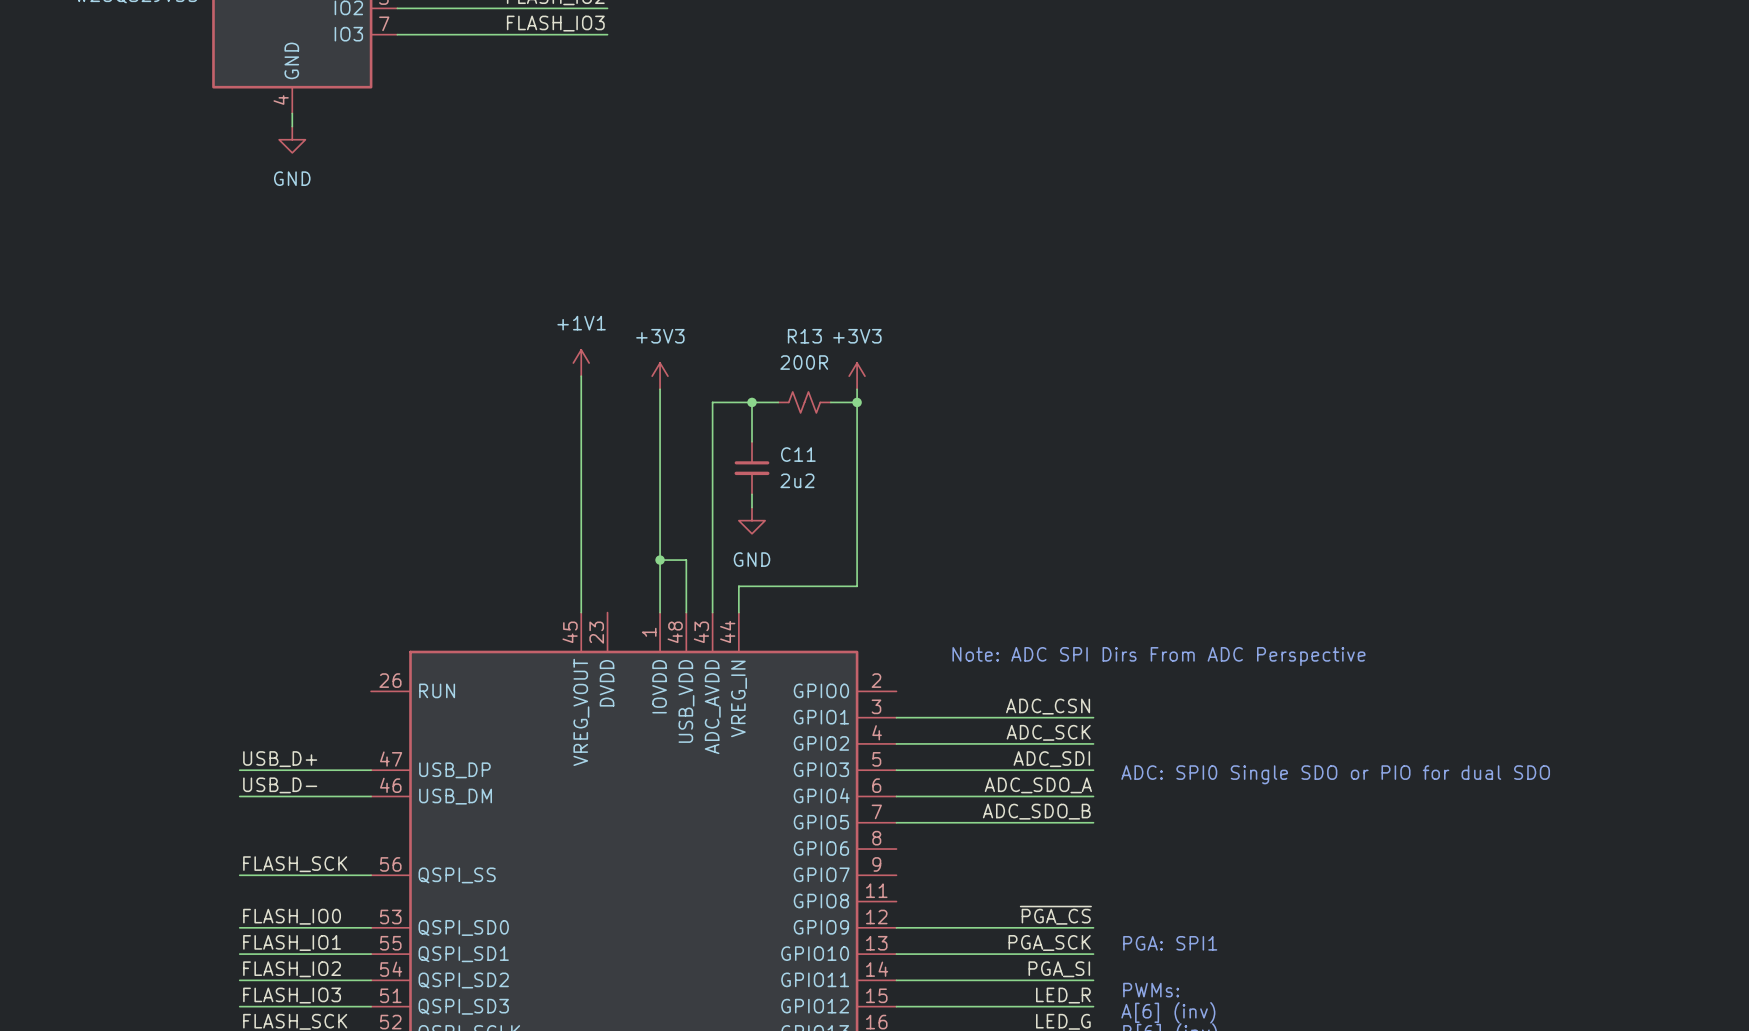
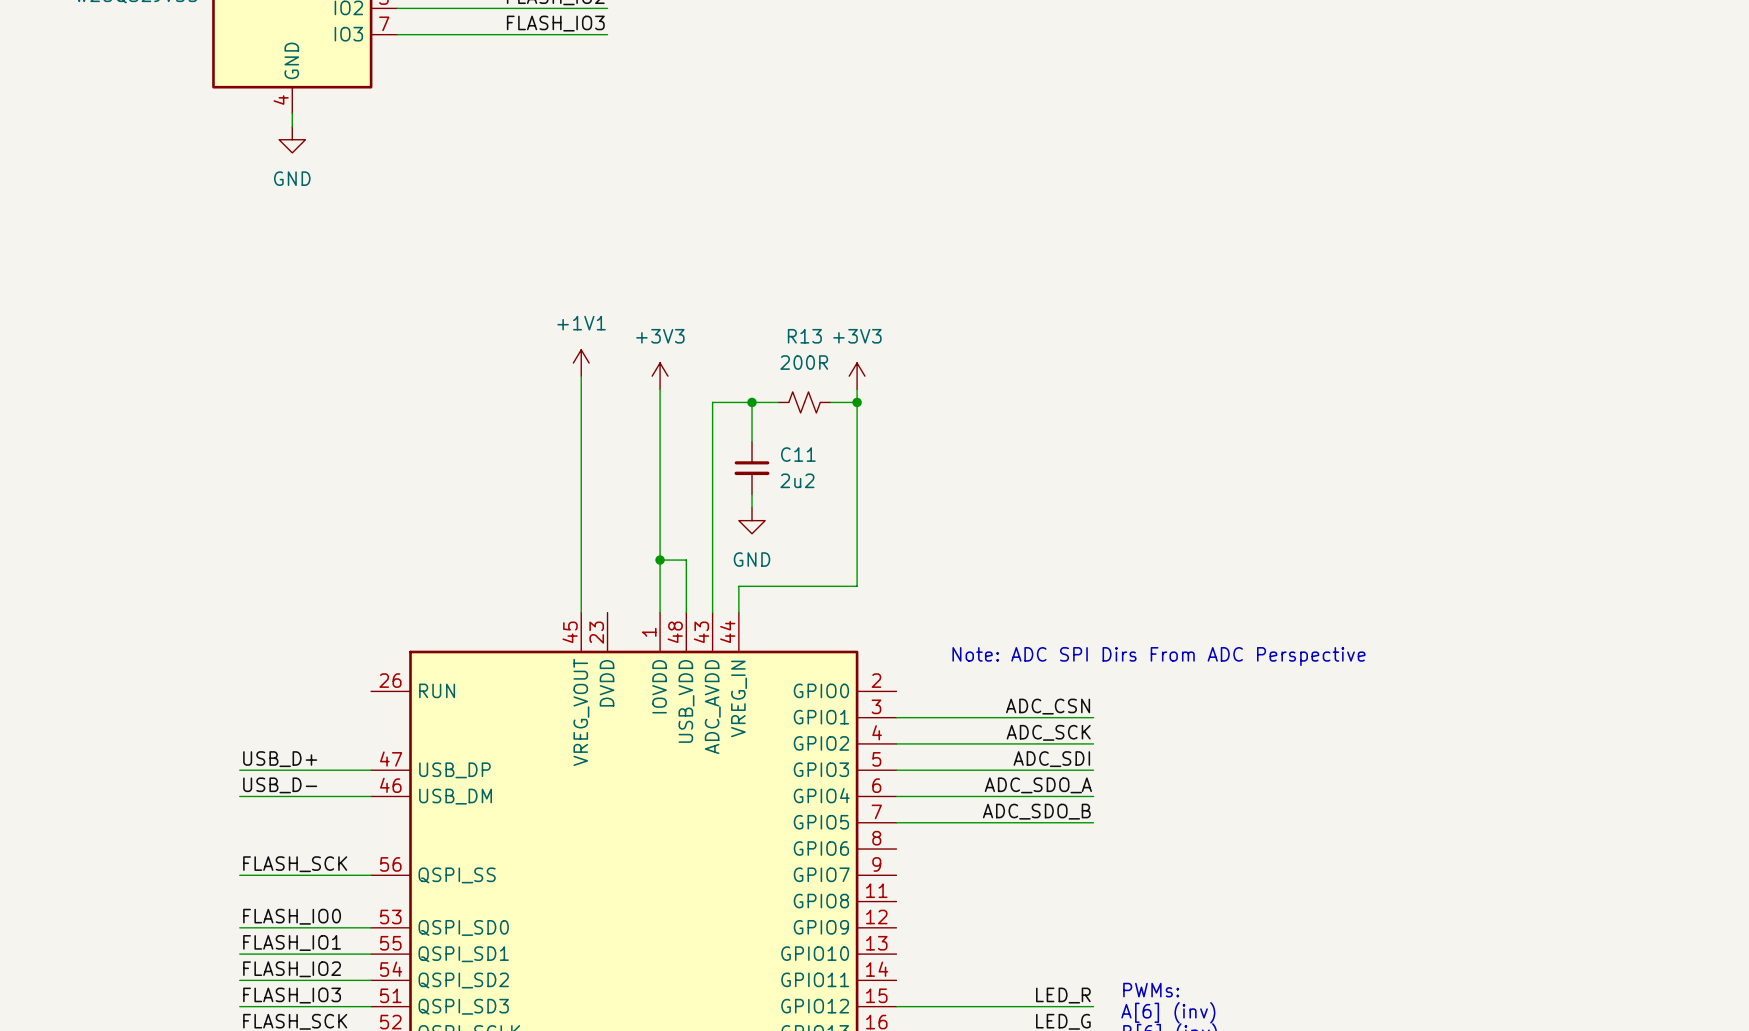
text: ADC: SPI0 Single SDO or PIO for dual SDO (1335, 774) -> none
label: ~{PGA_CS} (1055, 915) -> none
wire: (896, 927) (1093, 927) -> none
label: PGA_SCK (1049, 943) -> none
text: PGA: SPI1 (1170, 943) -> none
wire: (896, 954) (1093, 954) -> none
label: PGA_SI (1059, 969) -> none
wire: (896, 980) (1093, 980) -> none

